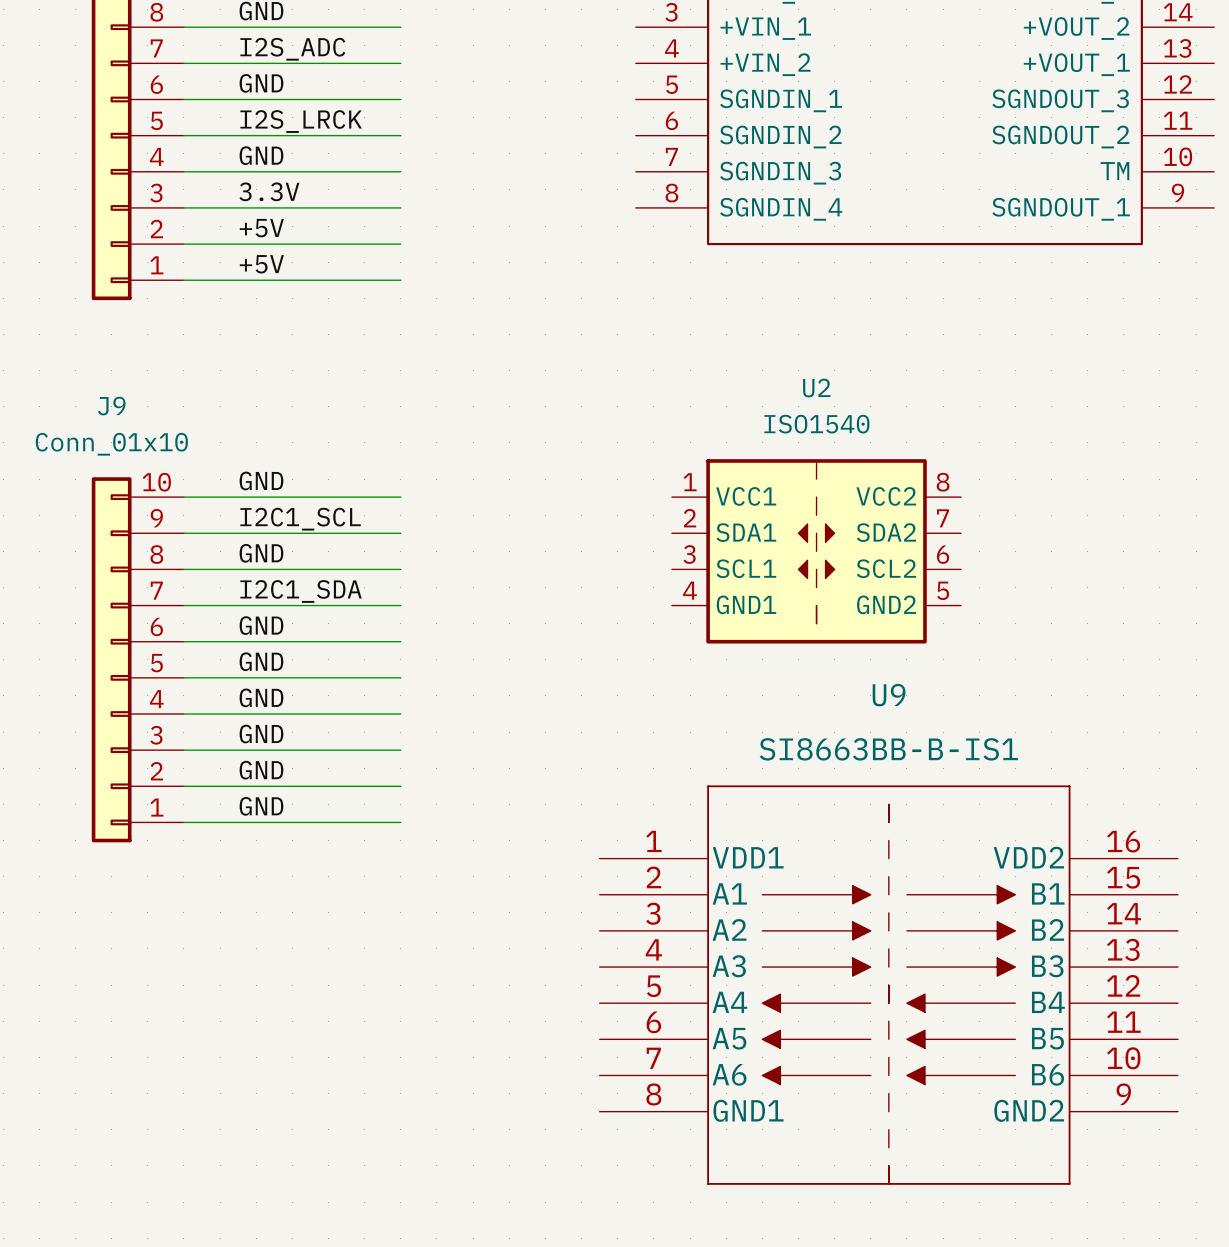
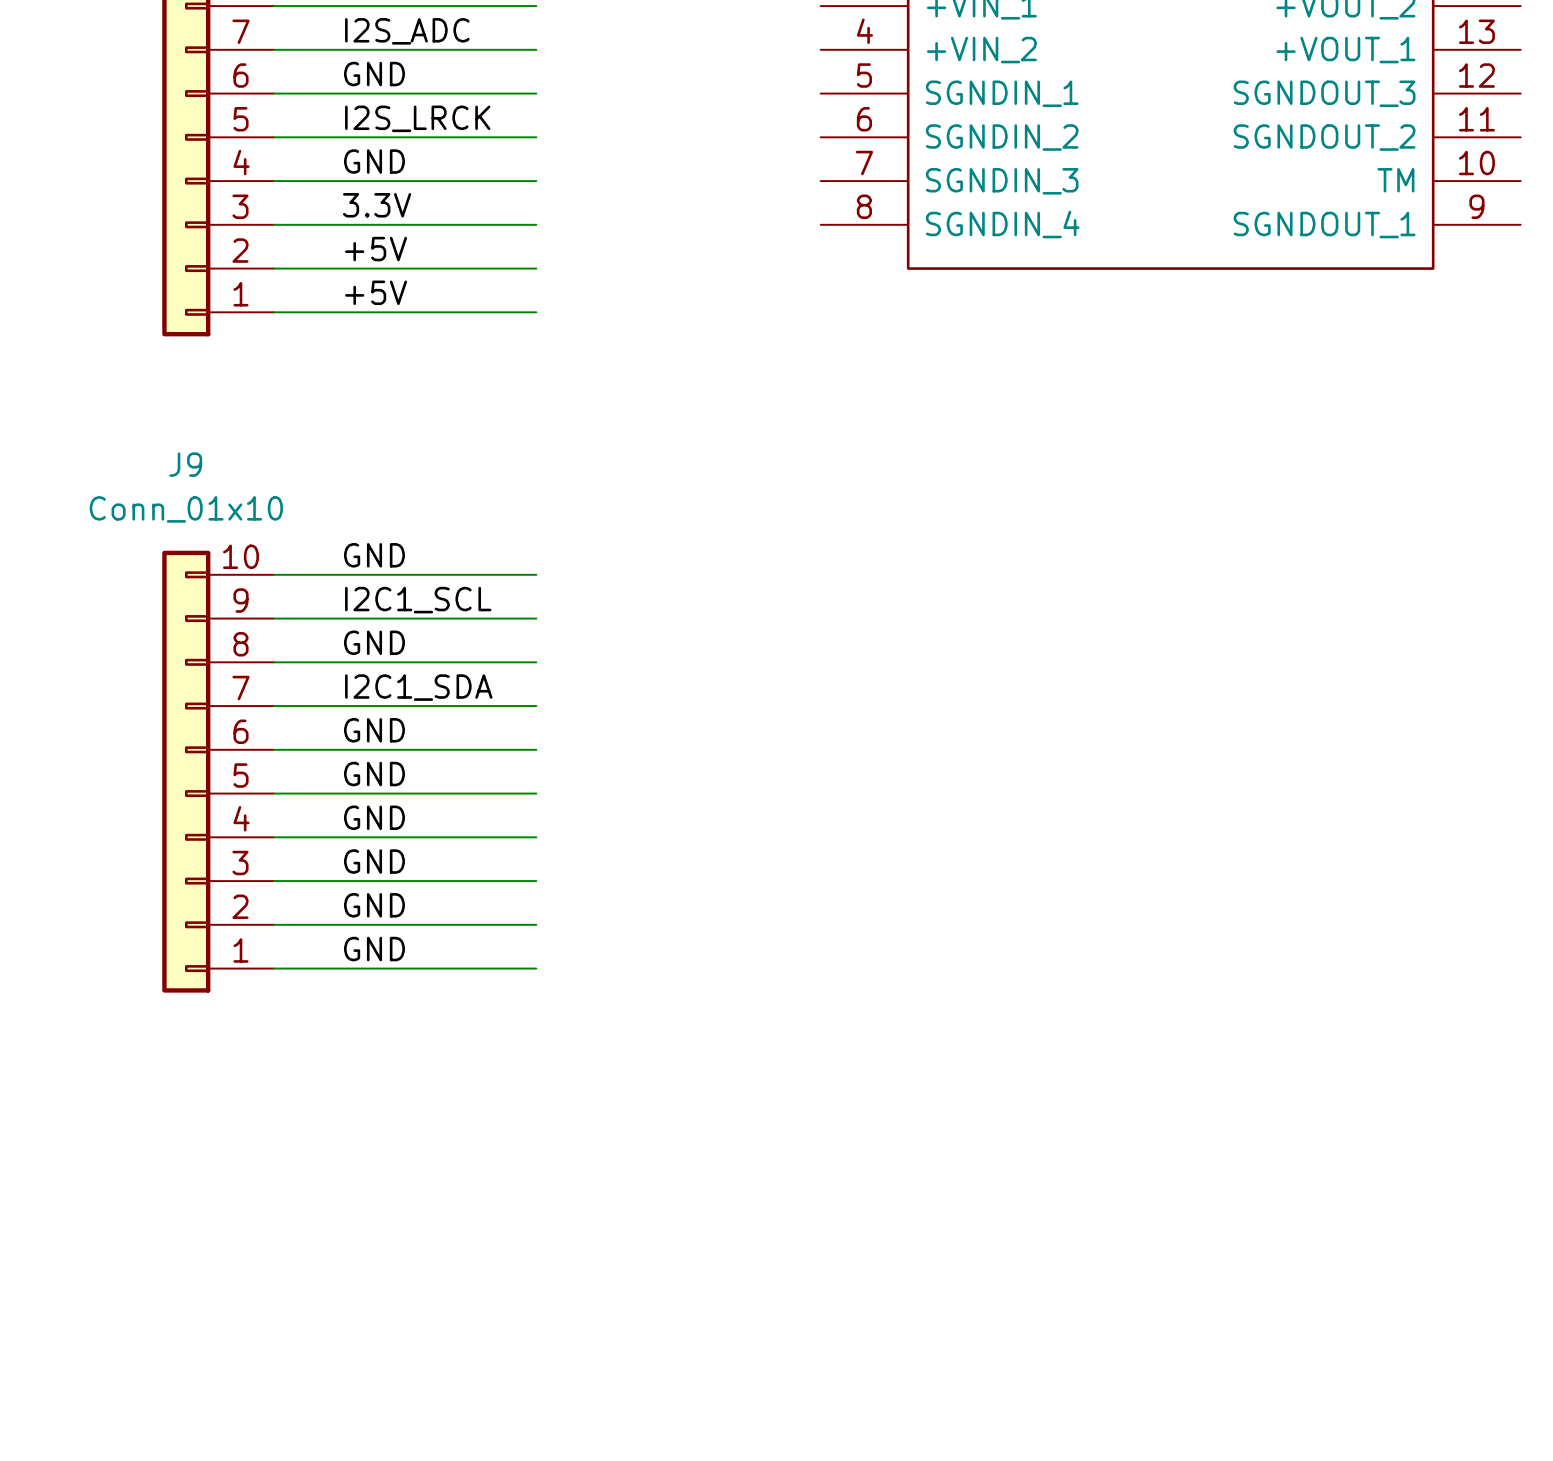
U2: ISO1540 (816, 551) -> none
U9: SI8663BB-B-IS1 (888, 985) -> none

